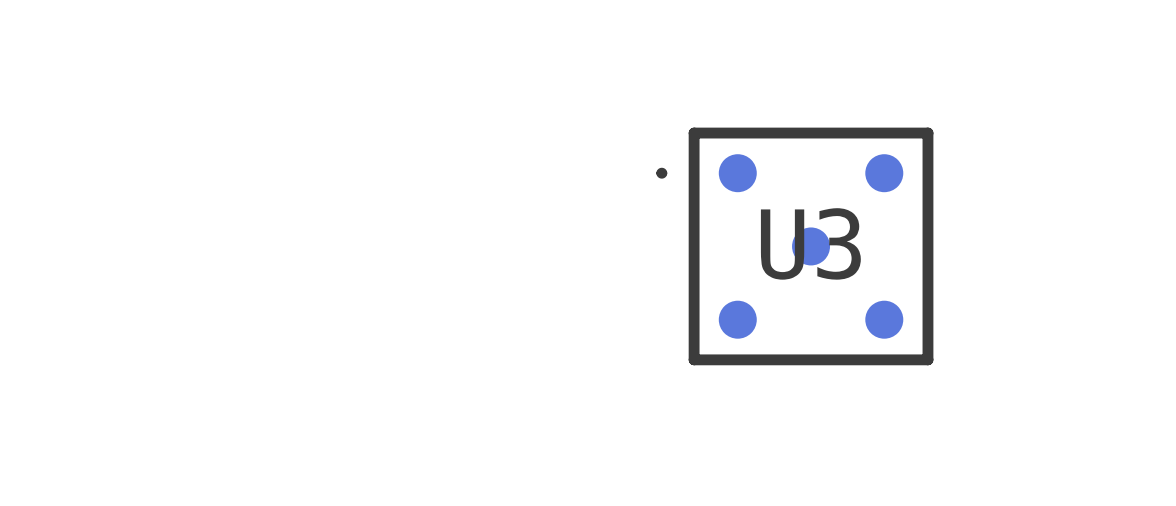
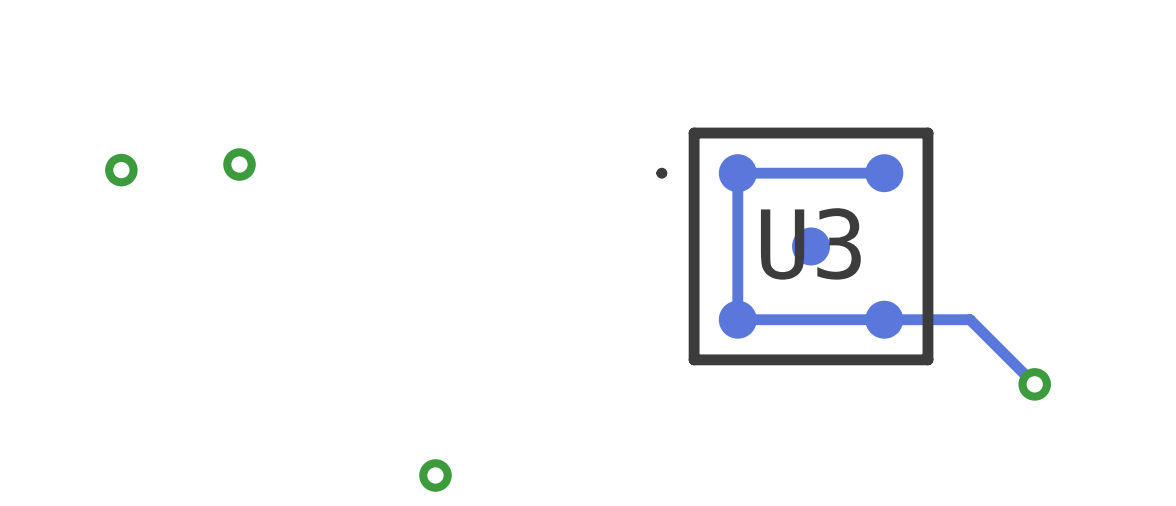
via: none -> (239, 164)
via: none -> (121, 170)
track: none -> (884, 173) (737, 173) (737, 319) (970, 319) (1034, 384)
via: none -> (1034, 384)
via: none -> (435, 475)

